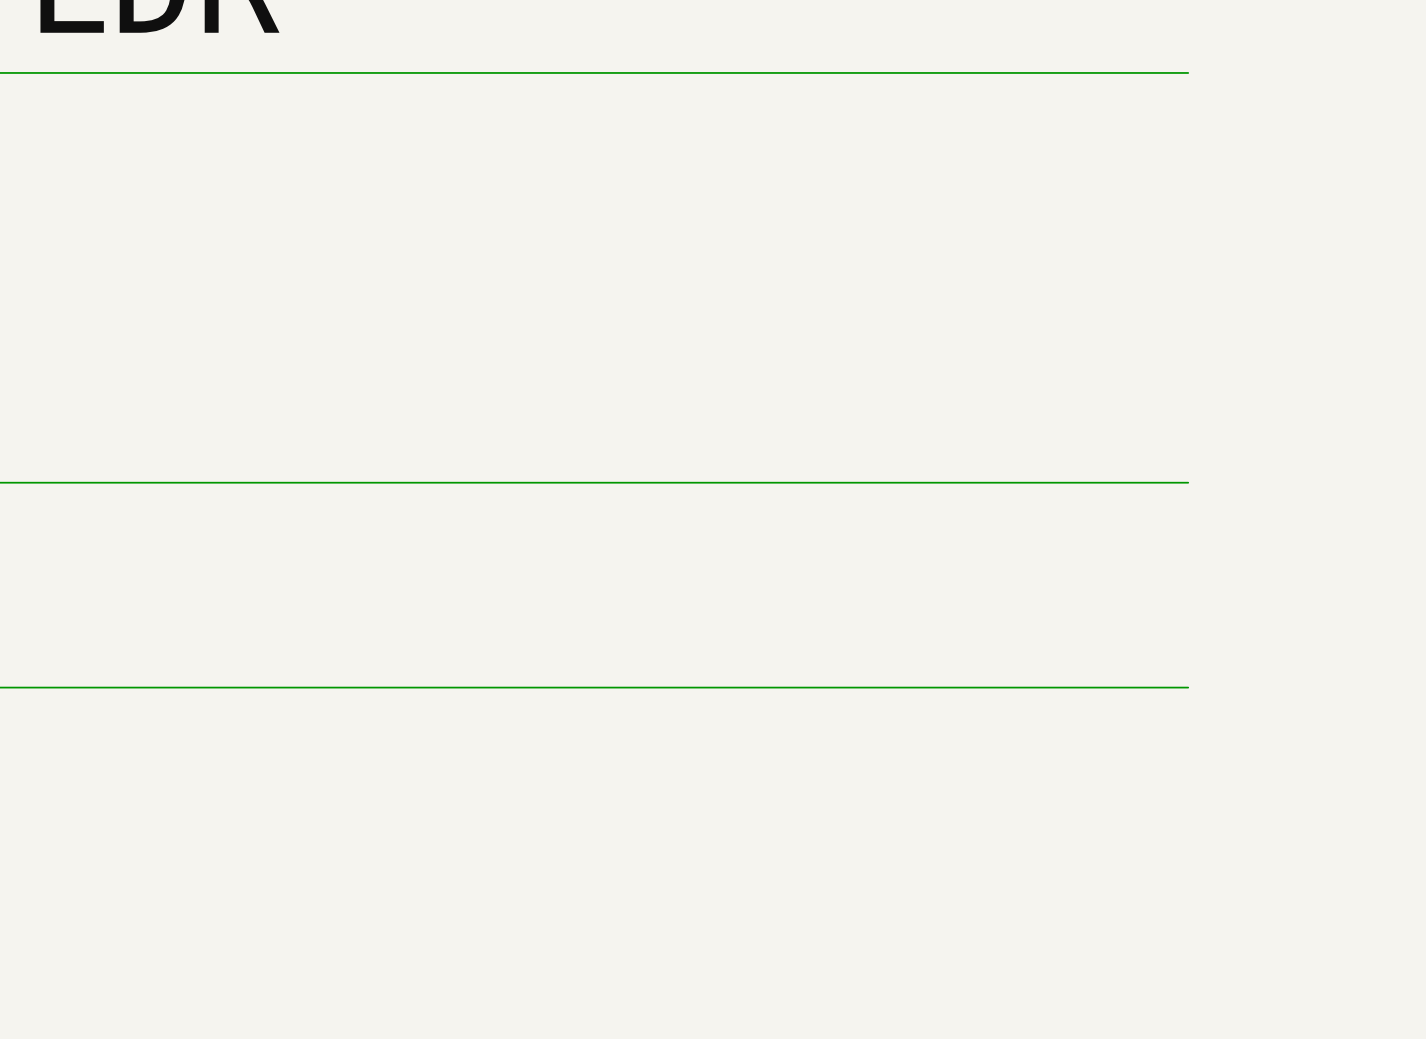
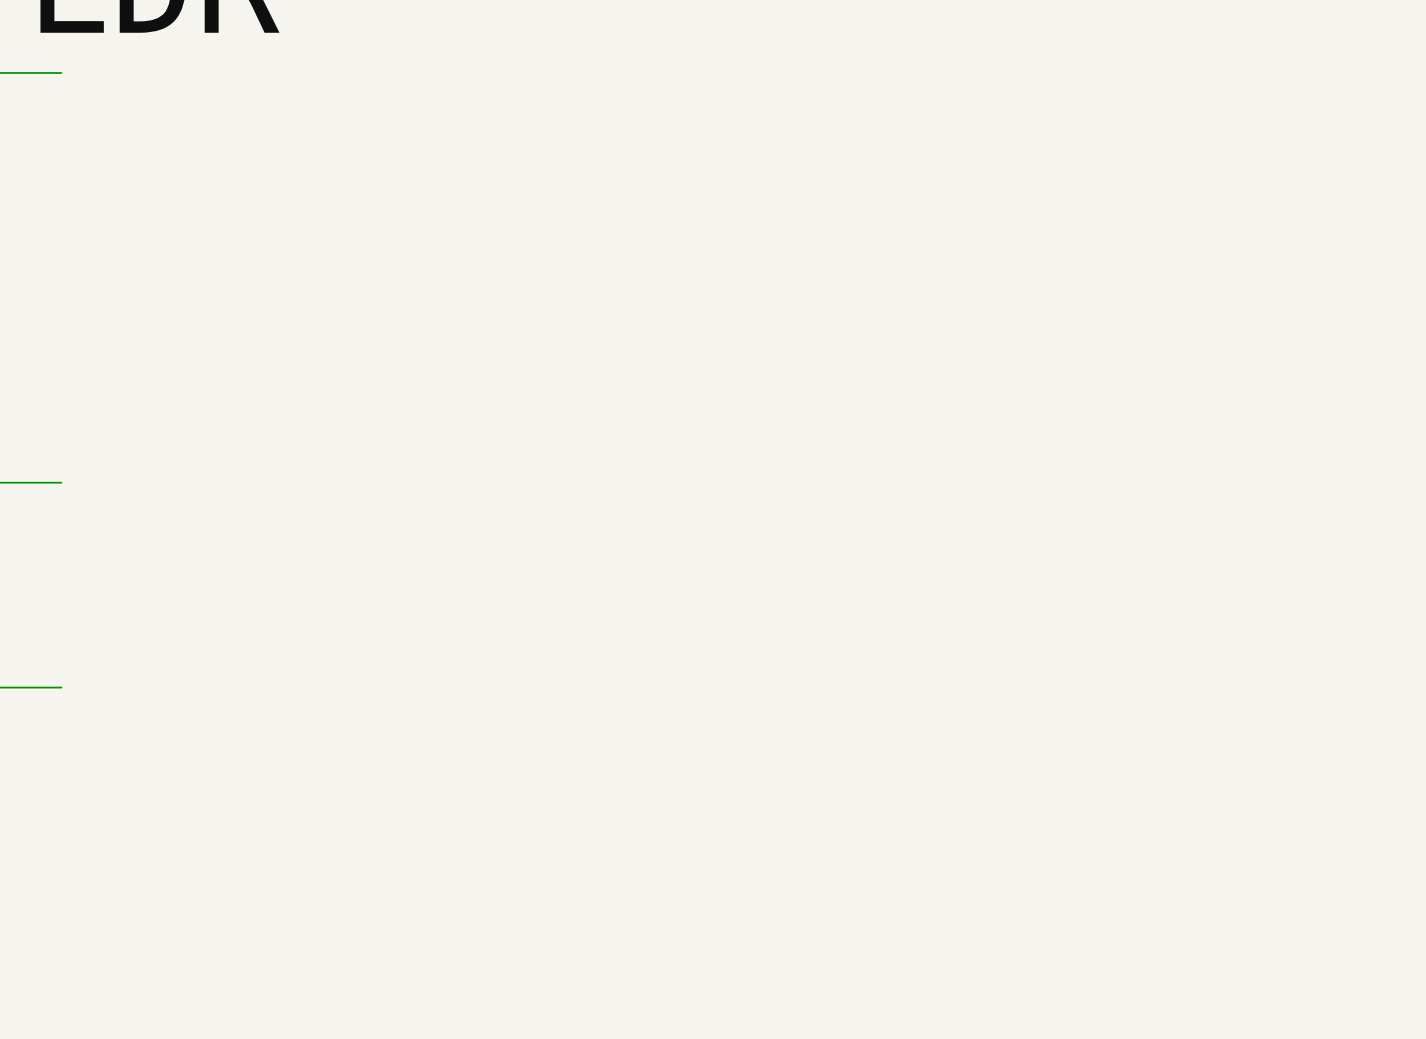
wire: (61, 72) (1188, 72) -> none
wire: (61, 482) (1188, 482) -> none
wire: (61, 687) (1188, 687) -> none

